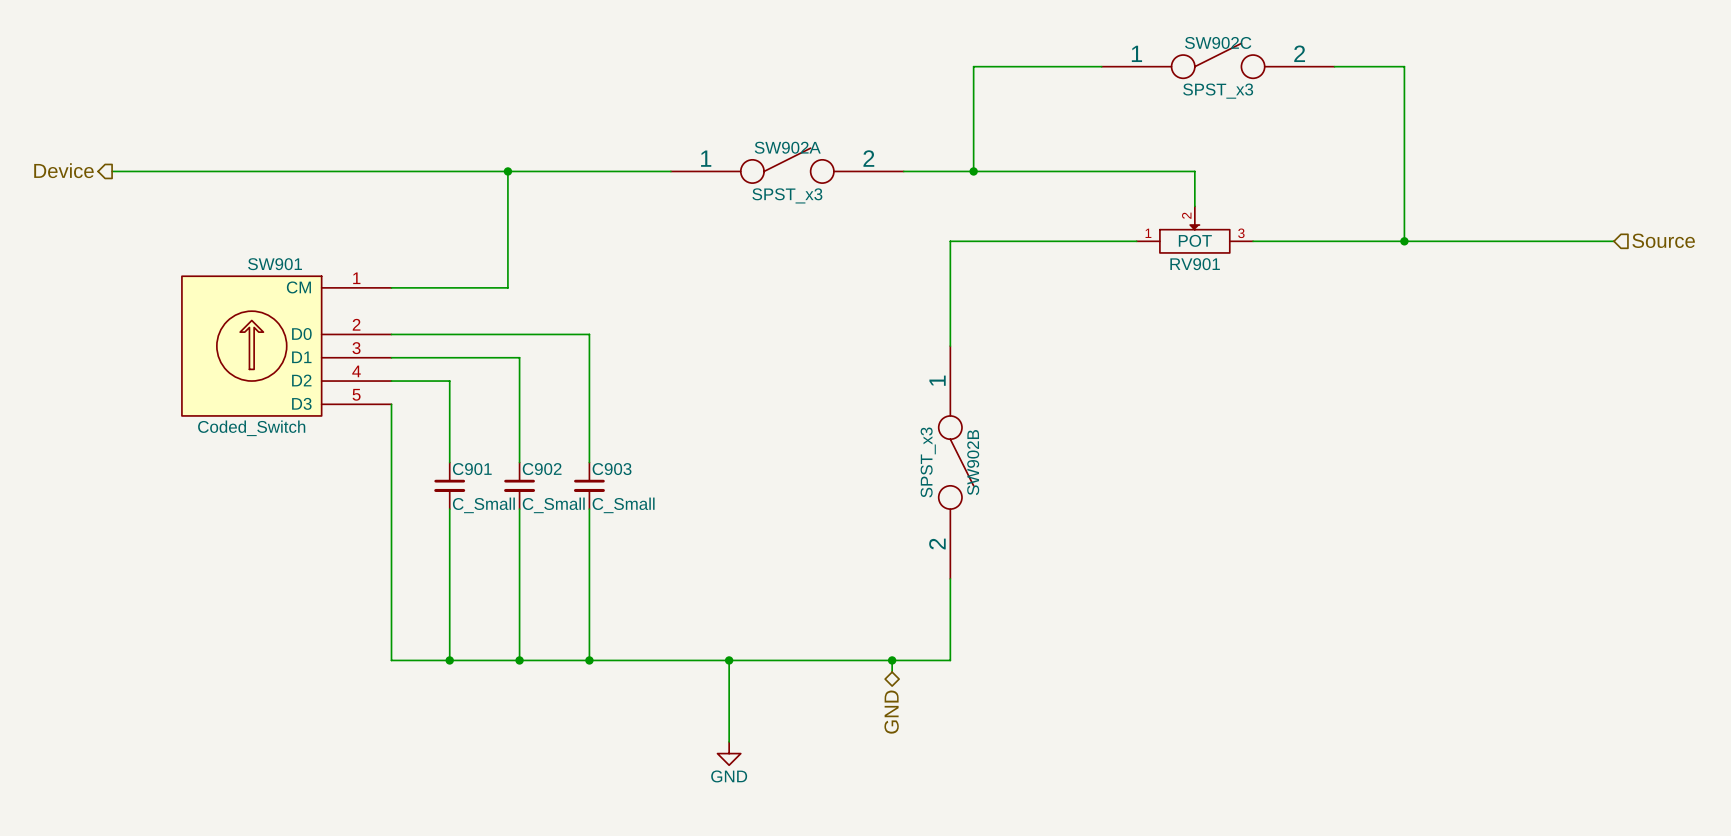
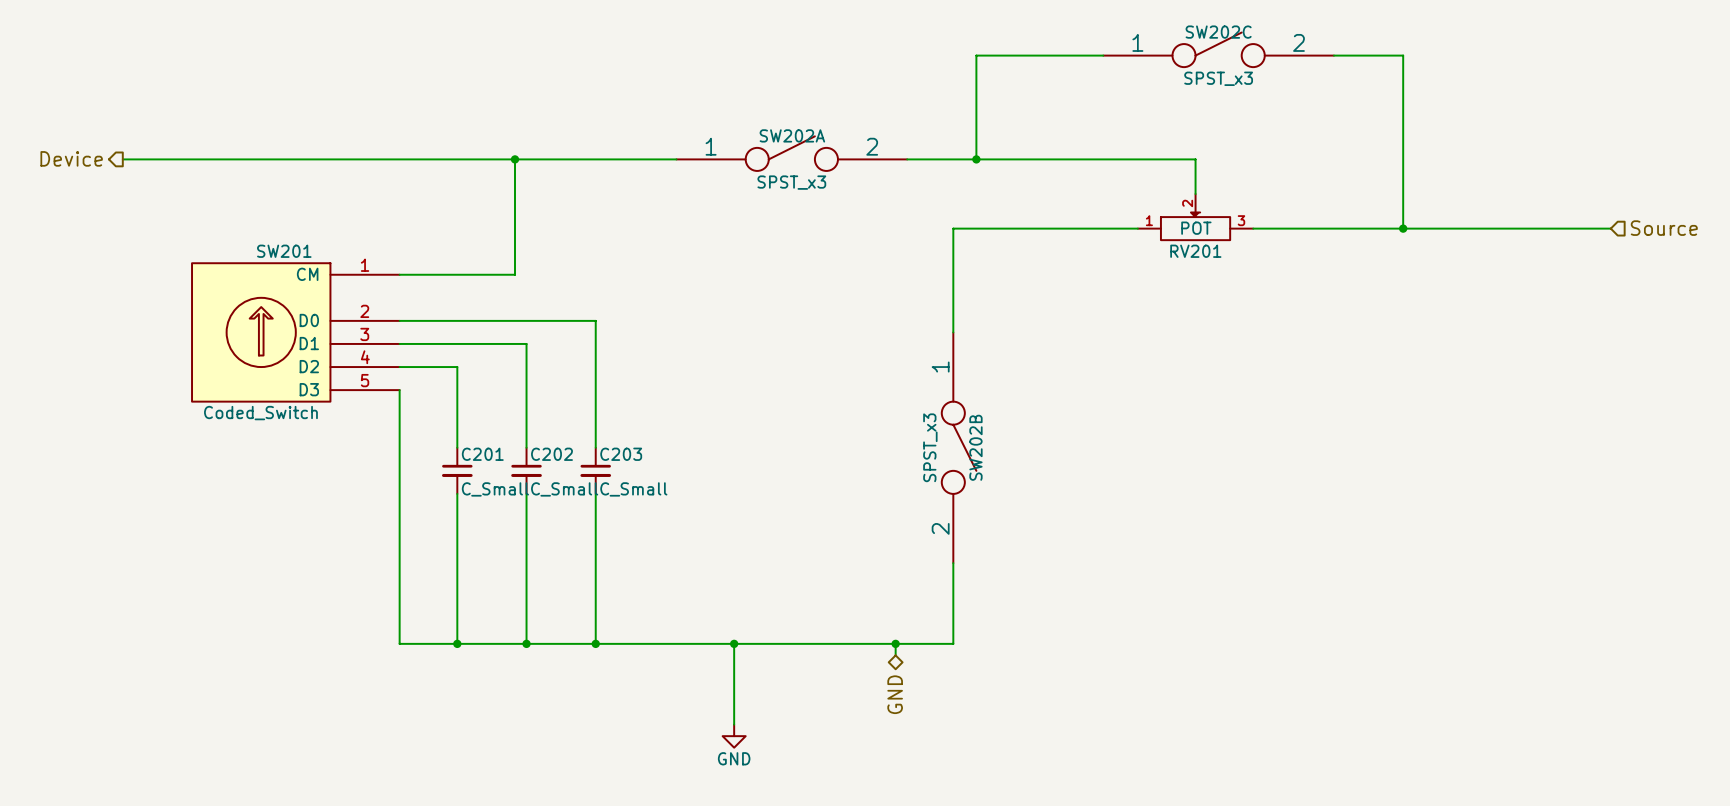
SW902C name: SW902C (1218, 42) -> SW202C (1218, 32)
SW902A name: SW902A (787, 147) -> SW202A (792, 135)
SW901 name: SW901 (275, 264) -> SW201 (284, 251)
RV901 name: RV901 (1195, 264) -> RV201 (1195, 251)
SW902B name: SW902B (973, 462) -> SW202B (975, 447)
C901 name: C901 (472, 469) -> C201 (482, 454)
C902 name: C902 (542, 469) -> C202 (551, 454)
C903 name: C903 (612, 469) -> C203 (621, 454)

